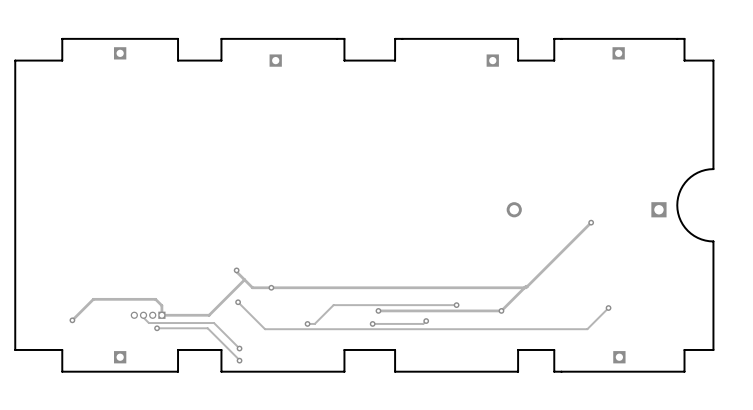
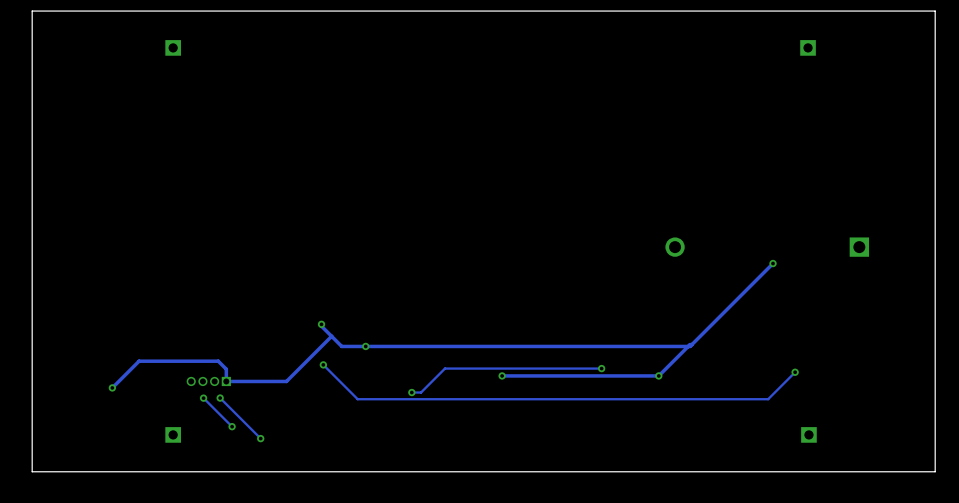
board edge: (684, 38) (554, 38) (554, 60) (518, 60) (518, 38) (395, 38) (395, 60) (344, 60) (344, 38) (221, 38) (221, 60) (178, 60) (178, 38) (62, 38) (62, 60) (15, 60) (15, 349) (62, 349) (62, 371) (178, 371) (178, 349) (221, 349) (221, 371) (344, 371) (344, 349) (395, 349) (395, 371) (518, 371) (518, 349) (554, 349) (554, 371) (684, 371) (684, 349) (713, 349) (713, 241) (701, 239) (687, 230) (679, 217) (677, 205) (679, 193) (687, 179) (701, 171) (713, 169) (713, 60) (684, 60) (684, 38) -> (935, 11) (935, 471) (32, 471) (32, 11) (935, 11)
part: (275, 60) -> none
part: (492, 60) -> none
track: (143, 315) (148, 323) (214, 323) (239, 348) -> none
track: (426, 321) (423, 323) (372, 323) -> none
via: (426, 321) -> none
via: (372, 323) -> none
track: none -> (203, 398) (232, 426)
via: none -> (203, 398)
track: (157, 328) (207, 328) (239, 360) -> (220, 398) (260, 438)
via: (239, 348) -> none
via: none -> (232, 426)
via: none -> (260, 438)
via: (239, 360) -> none

